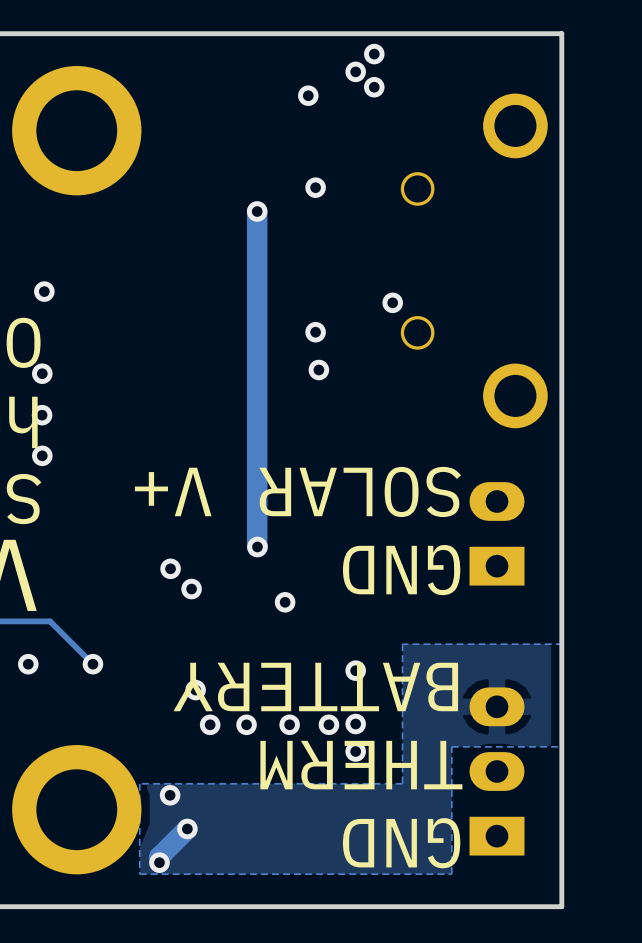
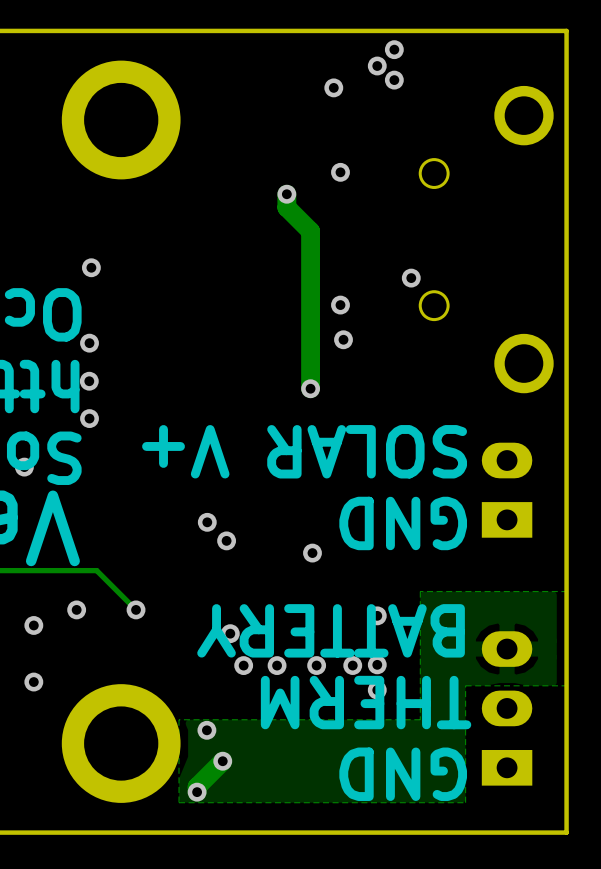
track: (257, 226) (257, 546) -> (286, 207) (310, 231) (310, 388)
via position: (257, 546) -> (310, 388)

